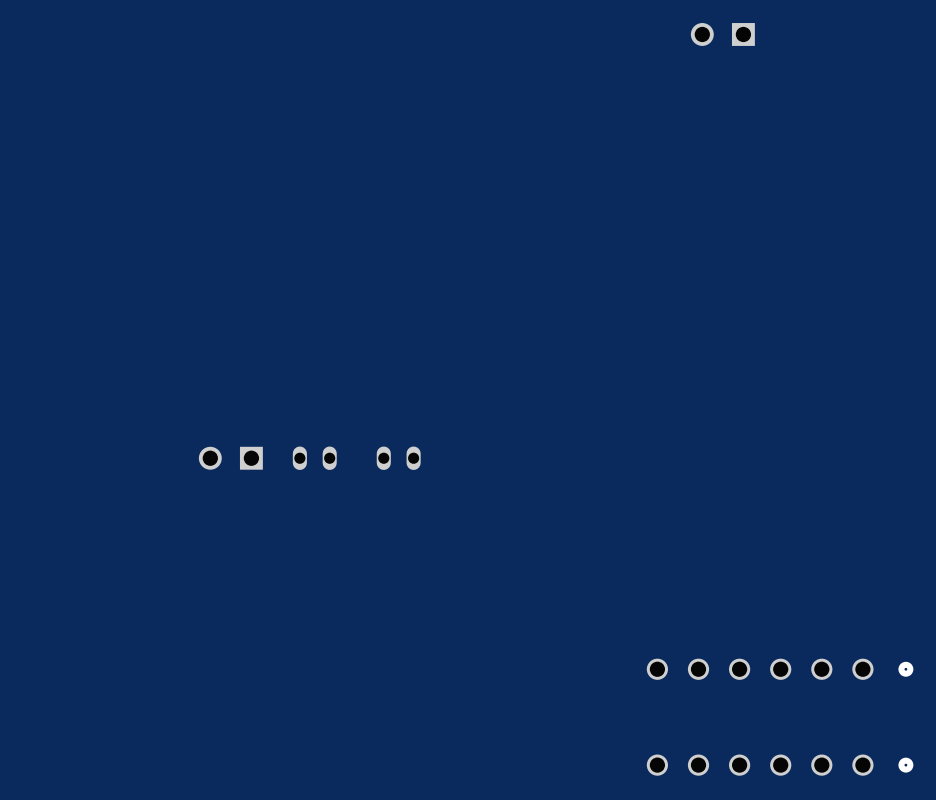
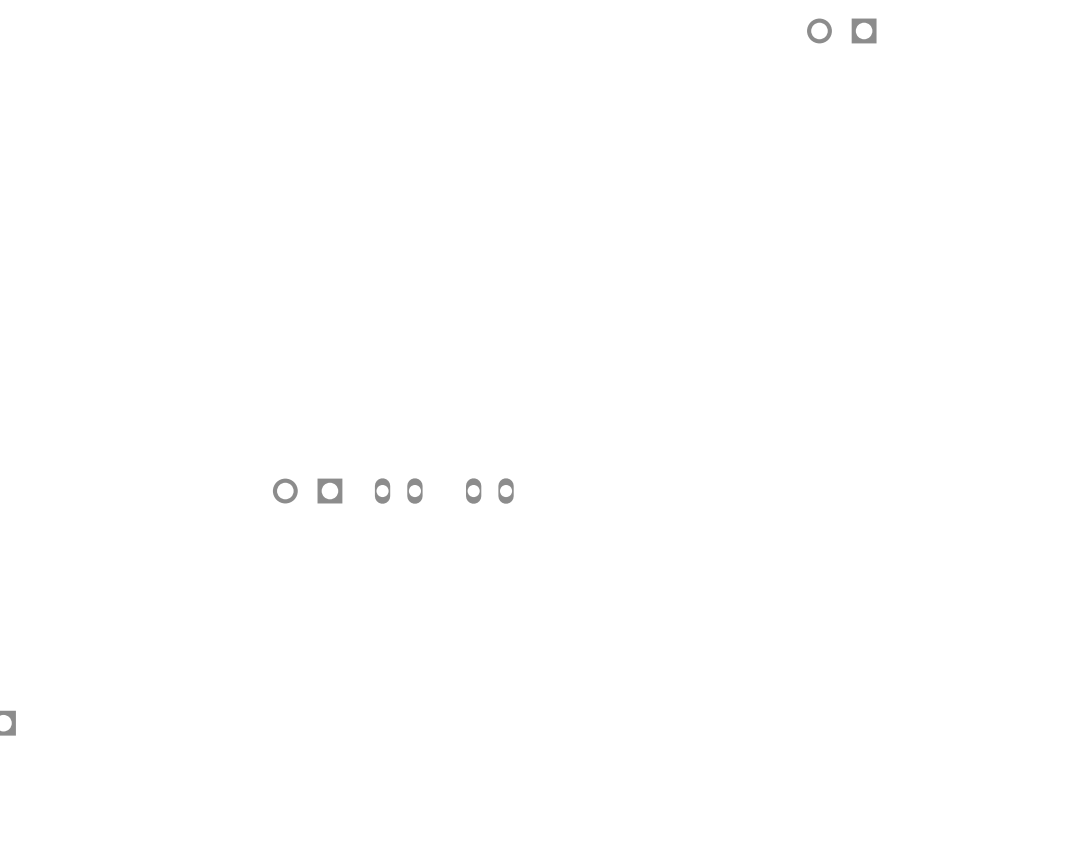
part: (780, 669) -> none
part: (780, 765) -> none

